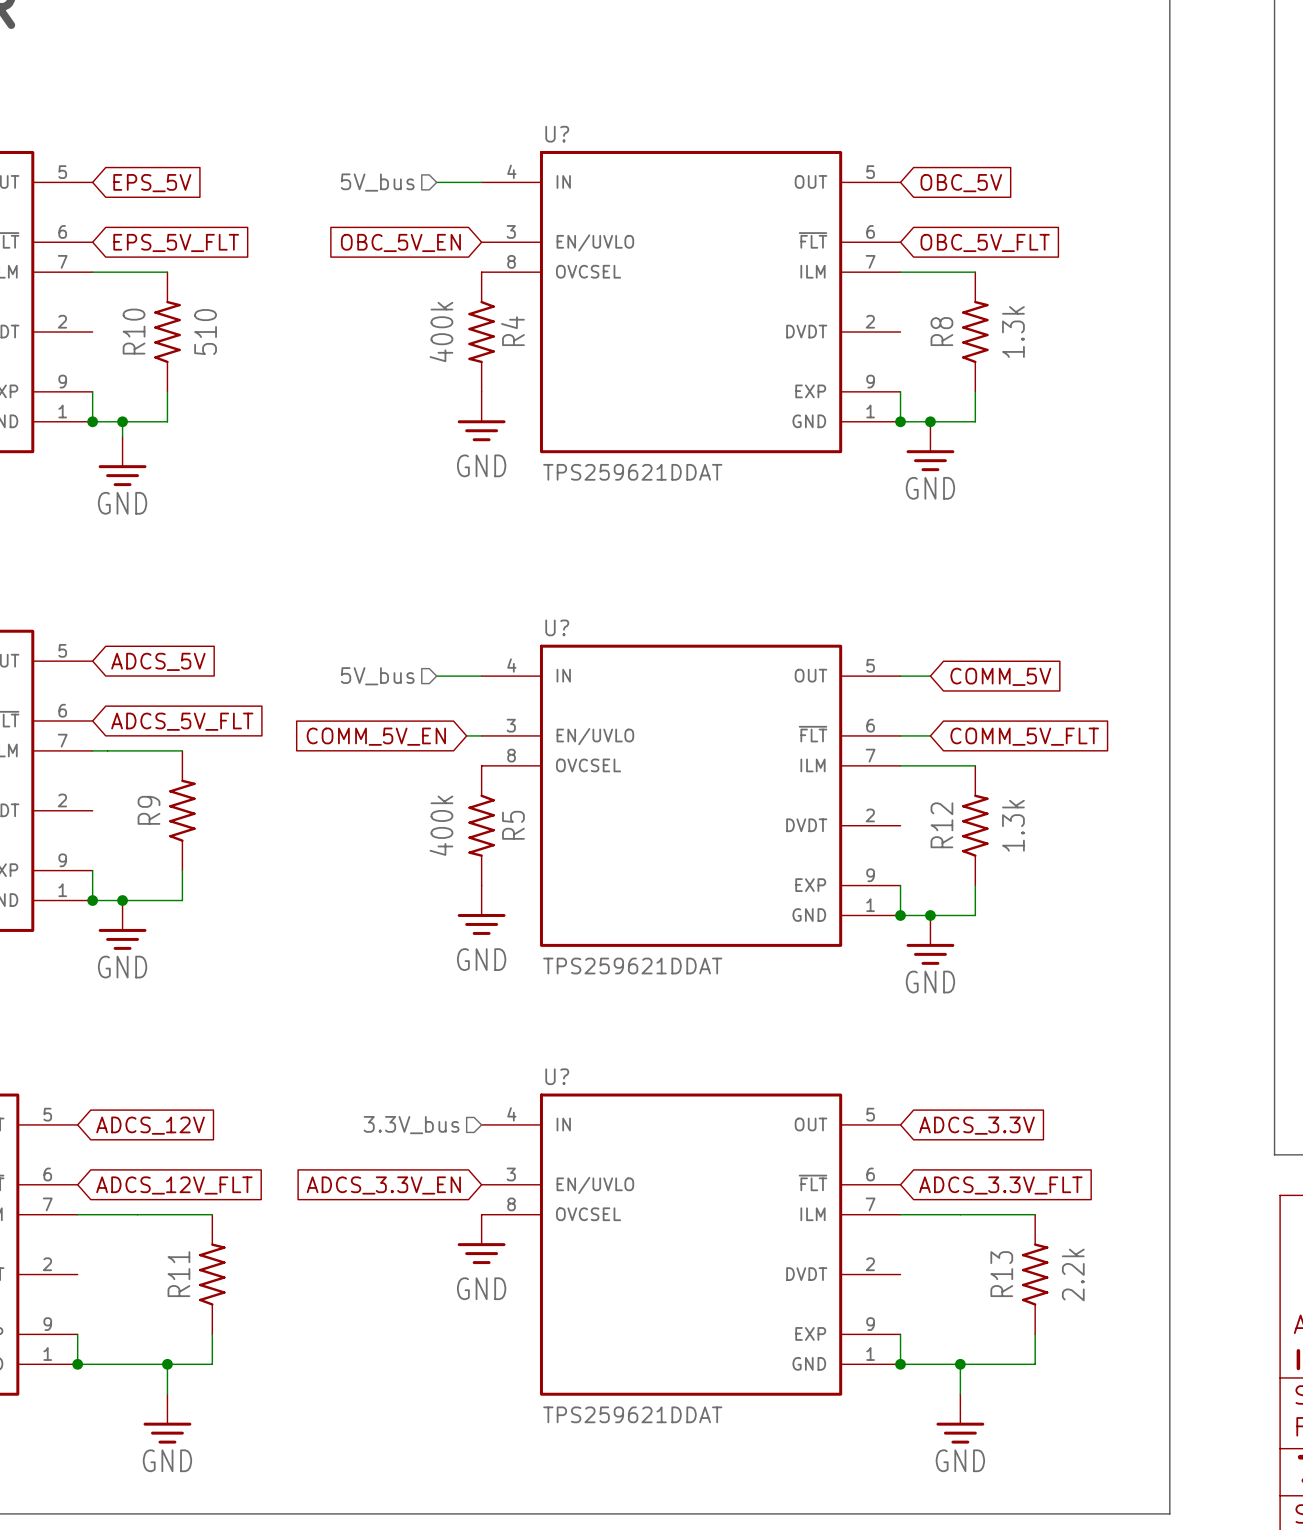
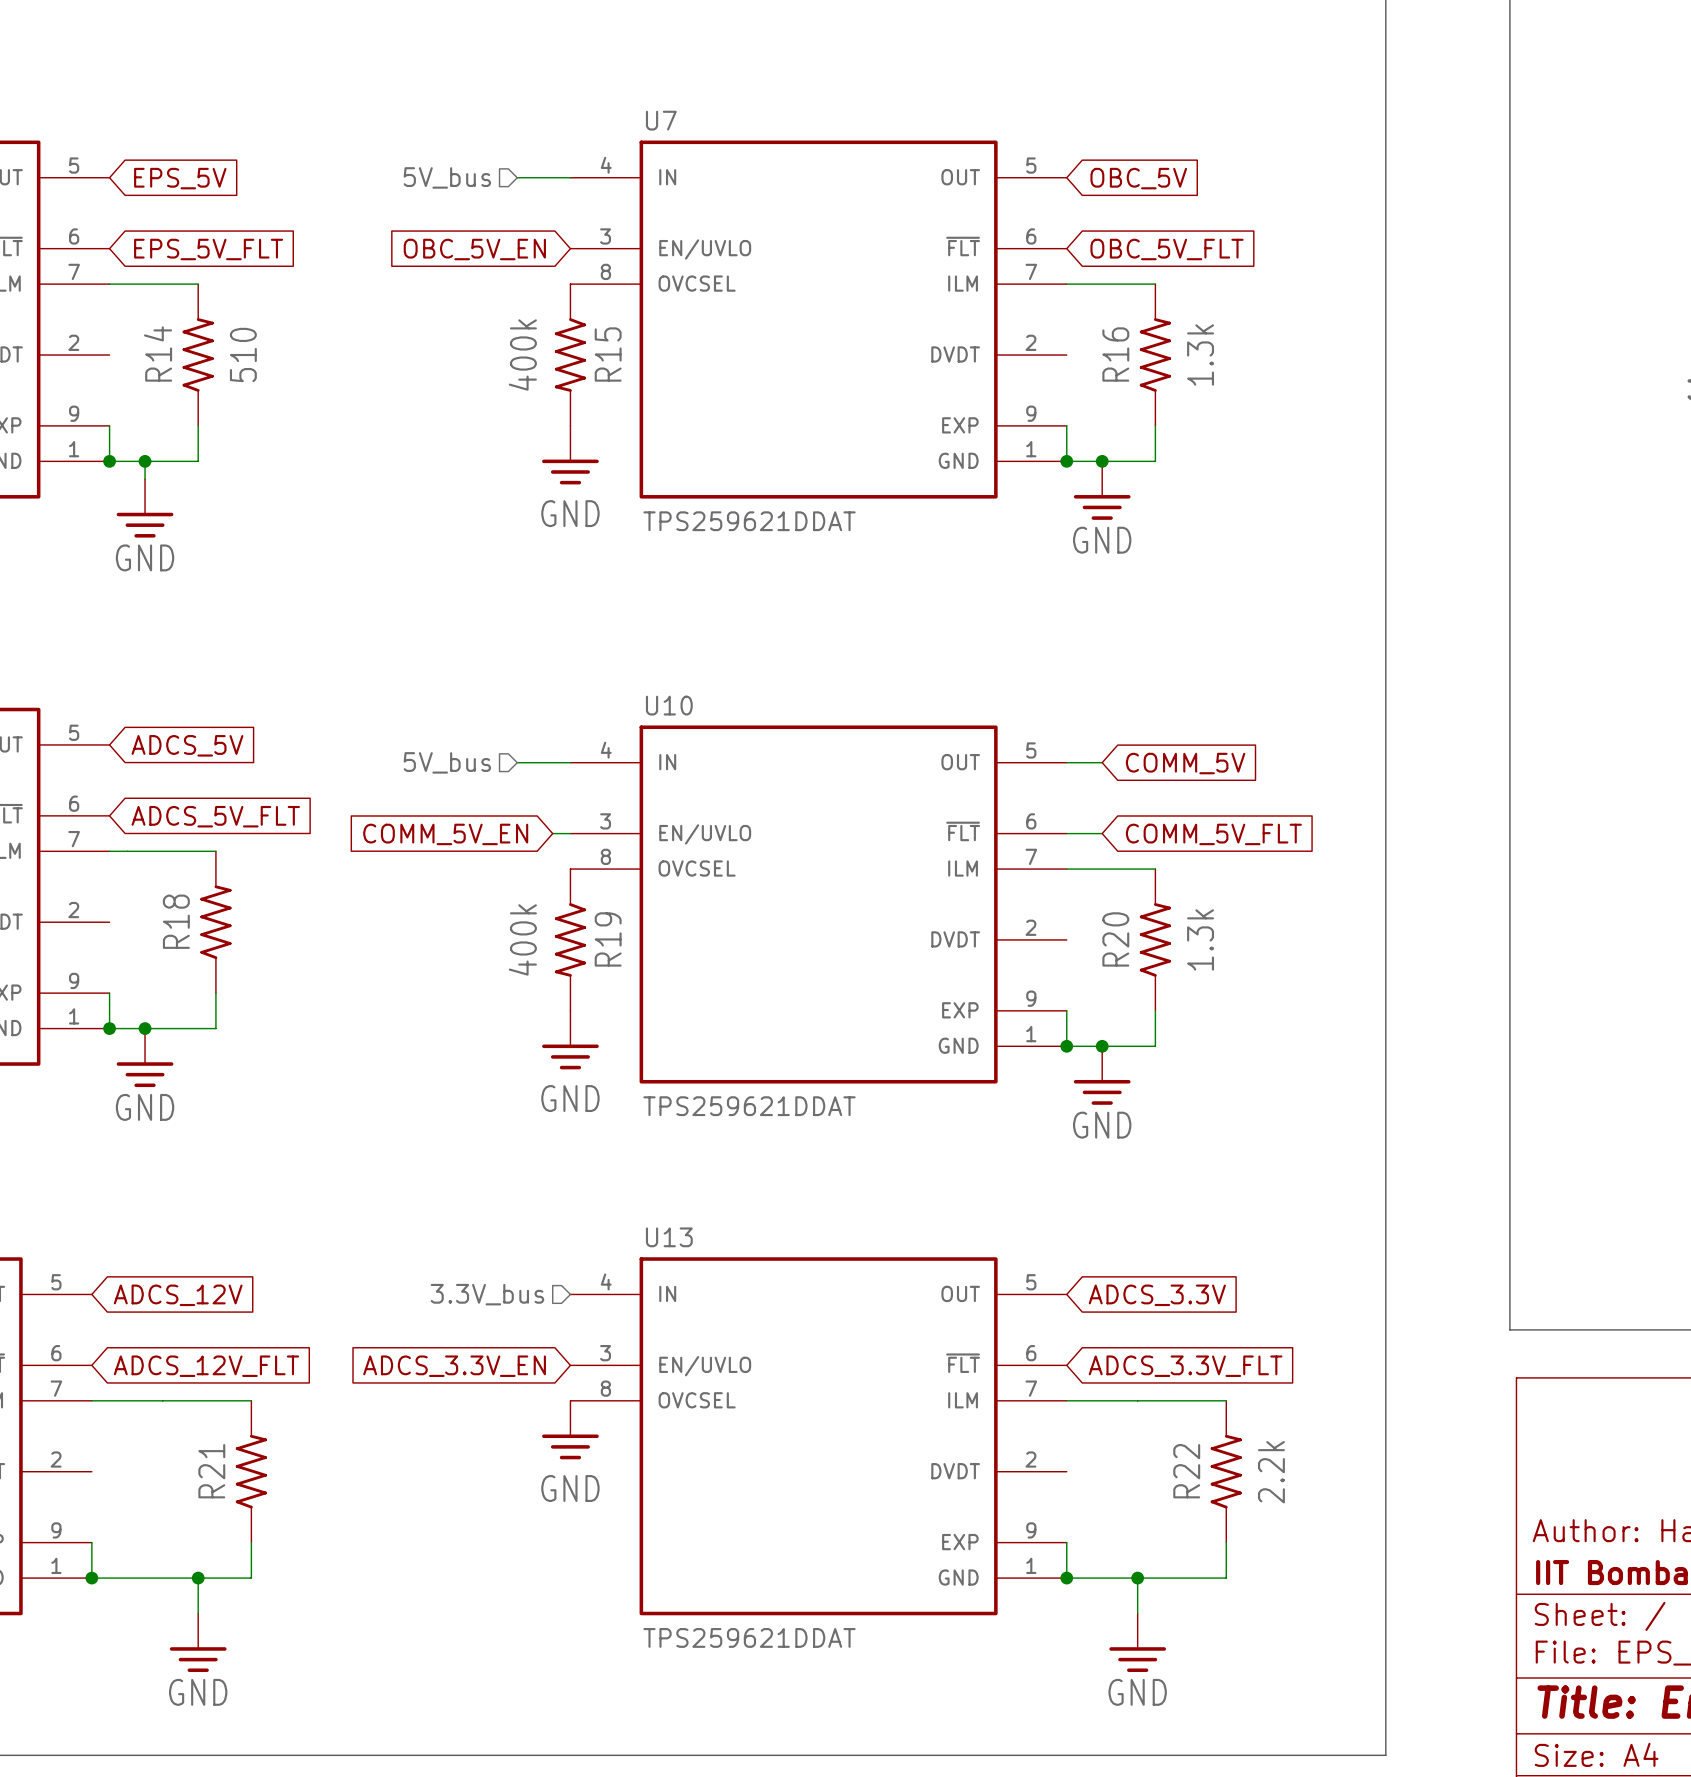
U? name: U? (557, 134) -> U7 (661, 120)
R10 name: R10 (134, 331) -> R14 (158, 354)
R4 name: R4 (512, 331) -> R15 (608, 354)
R8 name: R8 (941, 331) -> R16 (1115, 354)
U? name: U? (557, 627) -> U10 (669, 705)
R9 name: R9 (149, 810) -> R18 (176, 921)
R5 name: R5 (513, 825) -> R19 (608, 939)
R12 name: R12 (941, 825) -> R20 (1115, 939)
U? name: U? (557, 1076) -> U13 (669, 1237)
R11 name: R11 (178, 1274) -> R21 (211, 1471)
R13 name: R13 (1001, 1274) -> R22 (1186, 1471)

